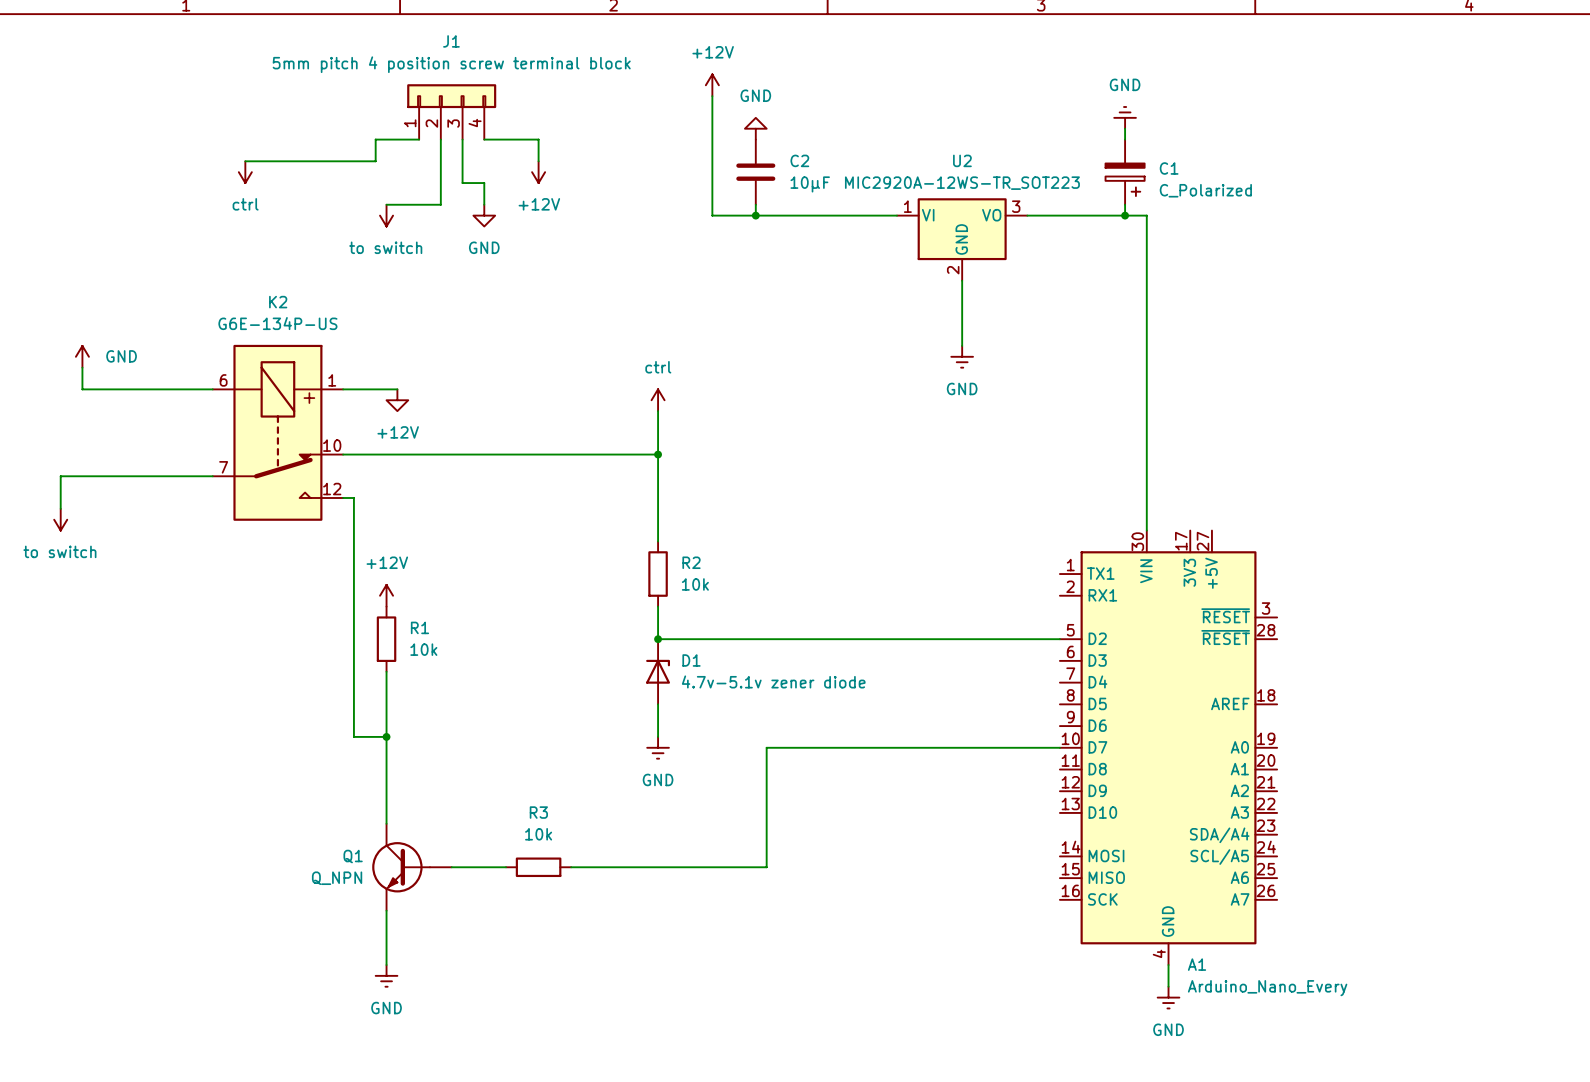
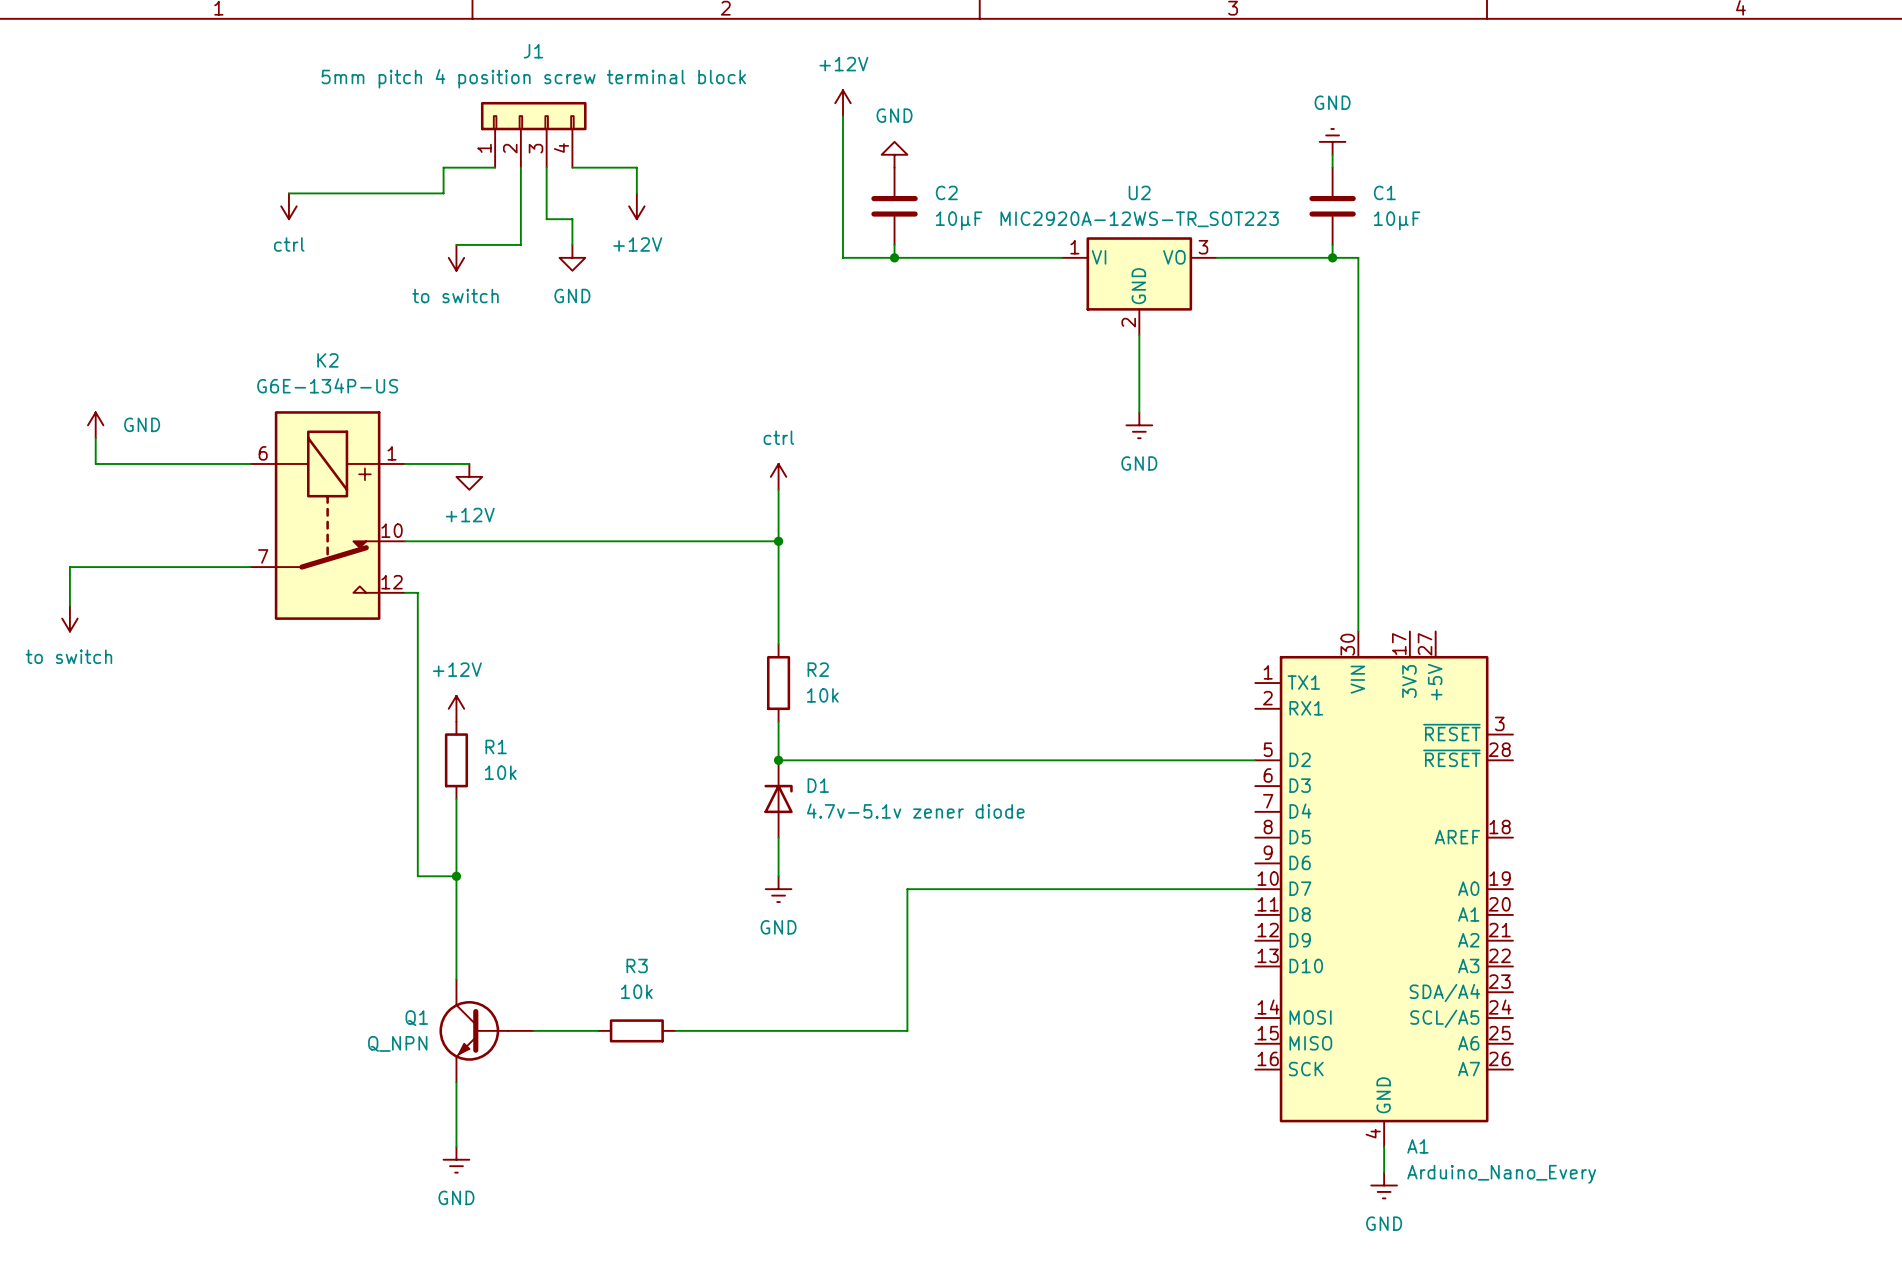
C1 symbol: [1105, 139, 1145, 205] -> [1309, 167, 1356, 245]
C1 value: C_Polarized (1205, 190) -> 10μF (1397, 220)

